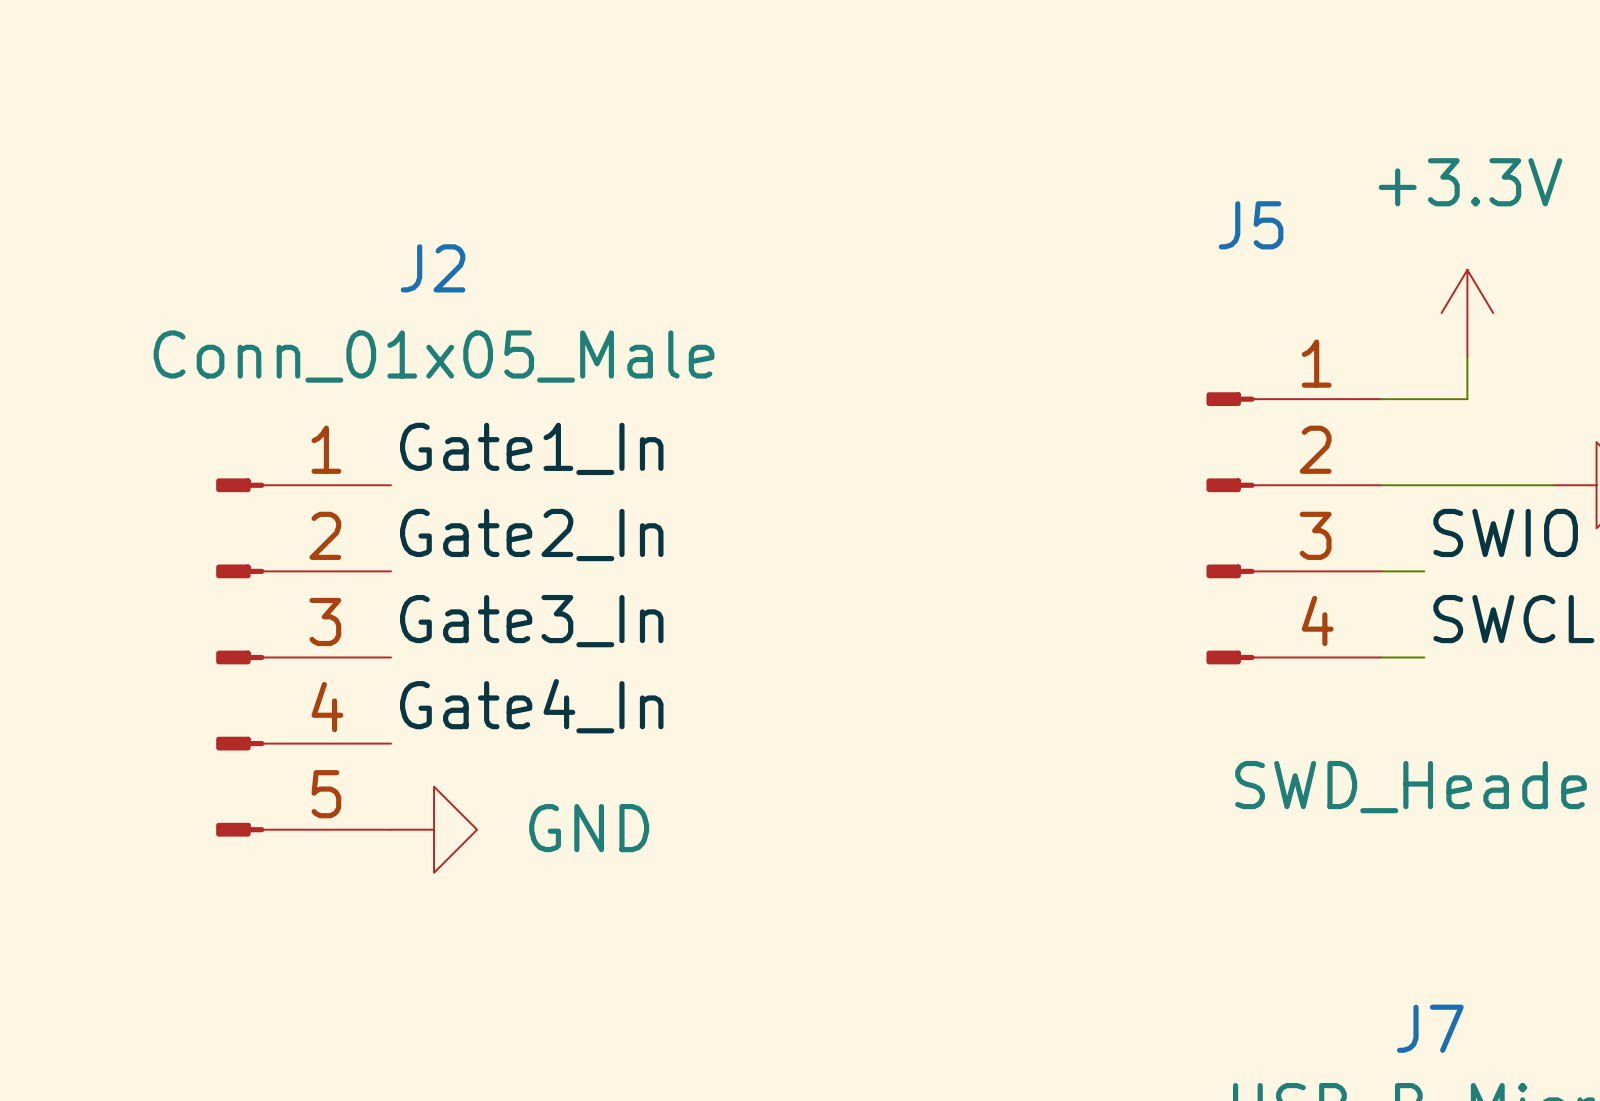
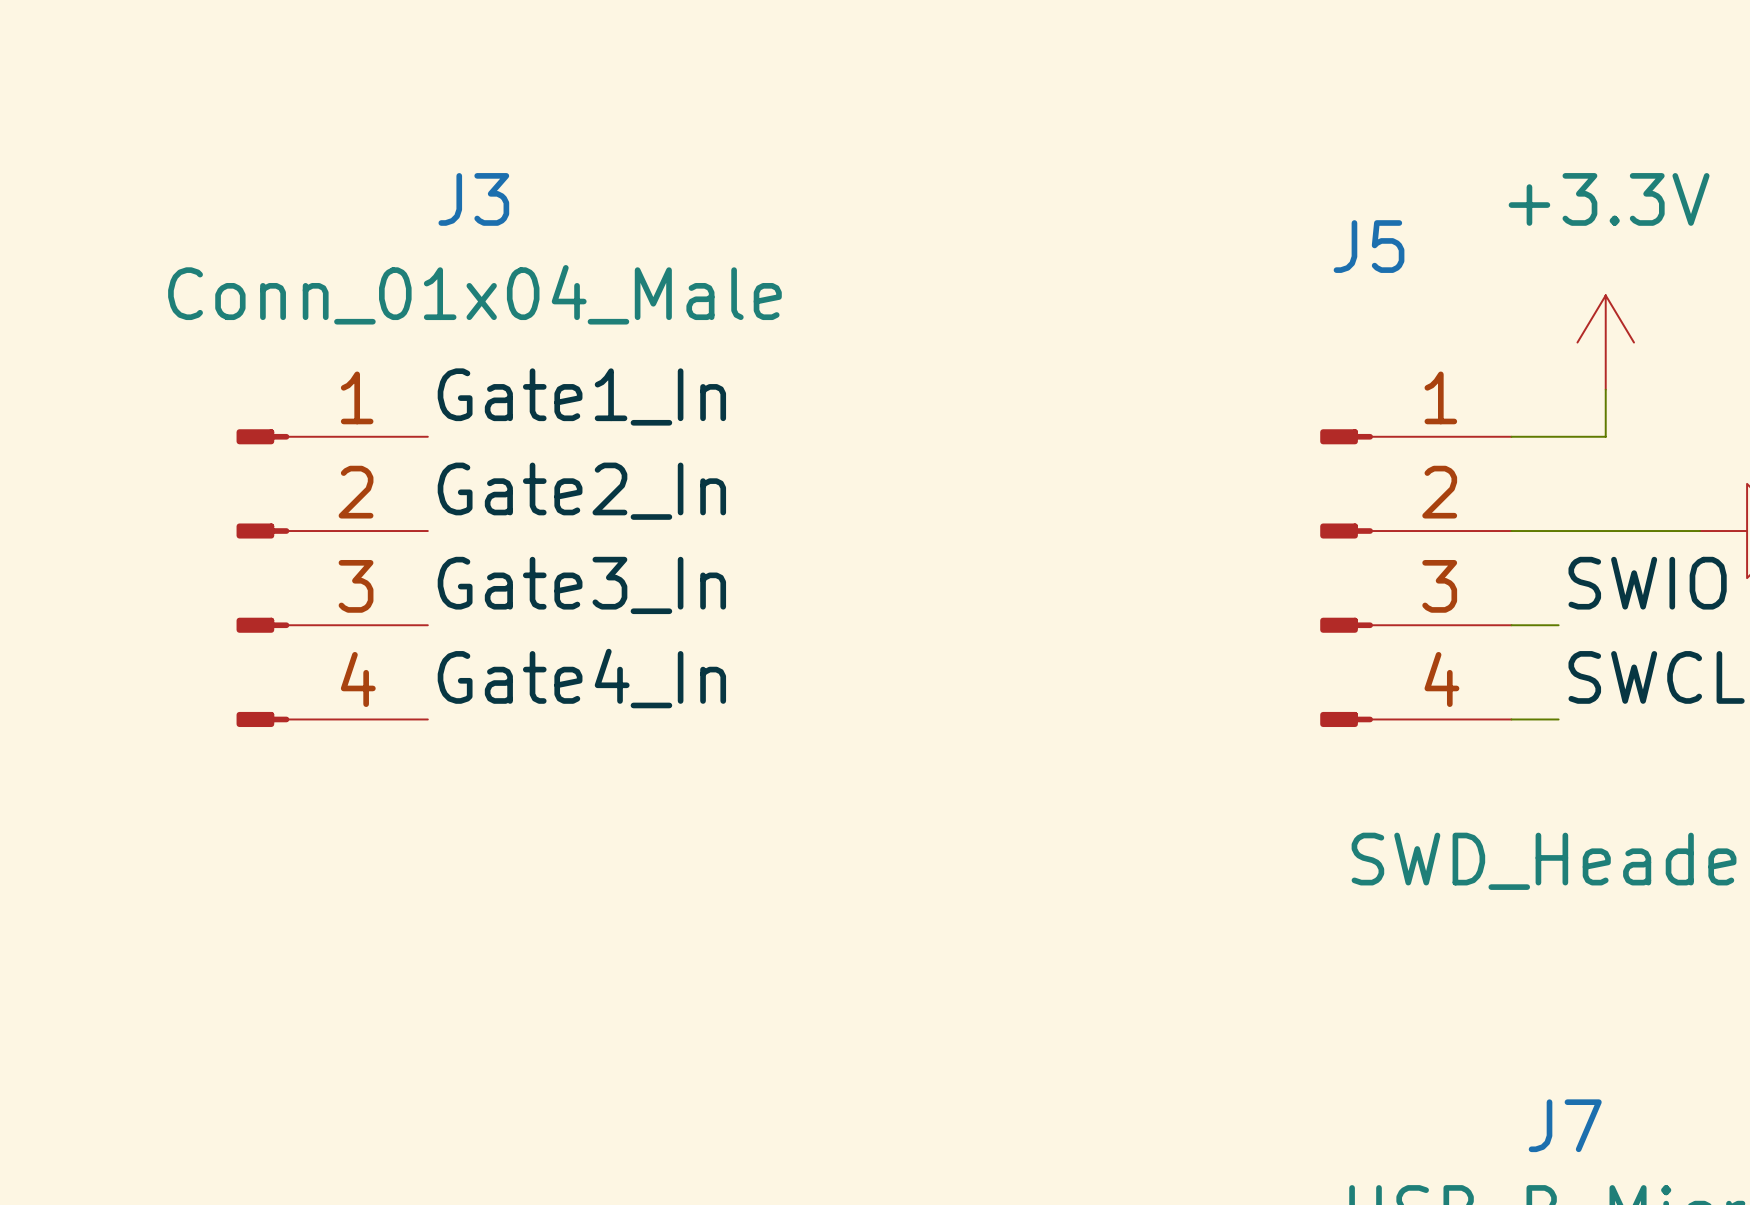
label: none -> Gate1_In (581, 396)
label: Gate1_In (531, 448) -> Gate2_In (581, 491)
J3: none -> Conn_01x04_Male (332, 578)
label: Gate2_In (531, 535) -> Gate3_In (581, 585)
label: Gate3_In (531, 621) -> Gate4_In (581, 678)
J2: Conn_01x05_Male (303, 657) -> none
label: Gate4_In (531, 706) -> none
power symbol: GND (434, 829) -> none

